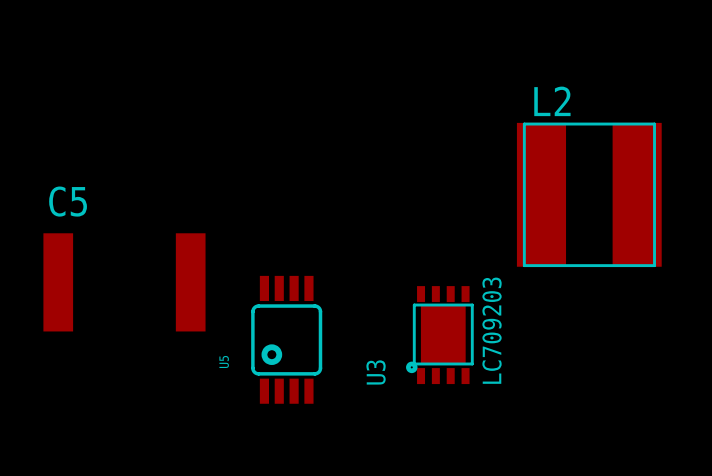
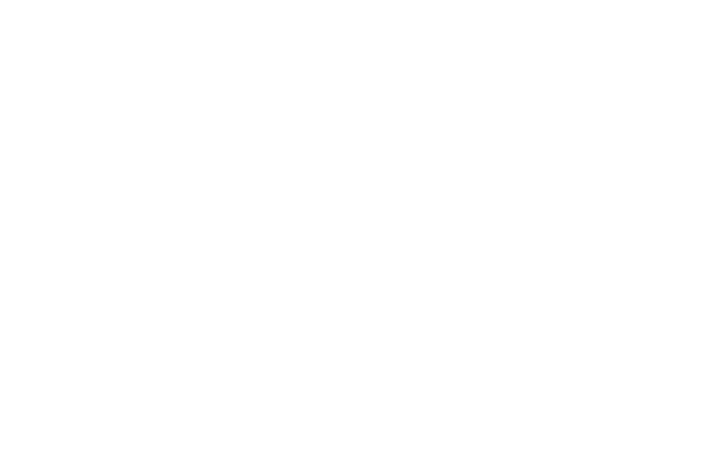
L2: (589, 194) -> none
C5: (124, 282) -> none
U3: LC709203 (439, 335) -> none
U5: (286, 339) -> none

